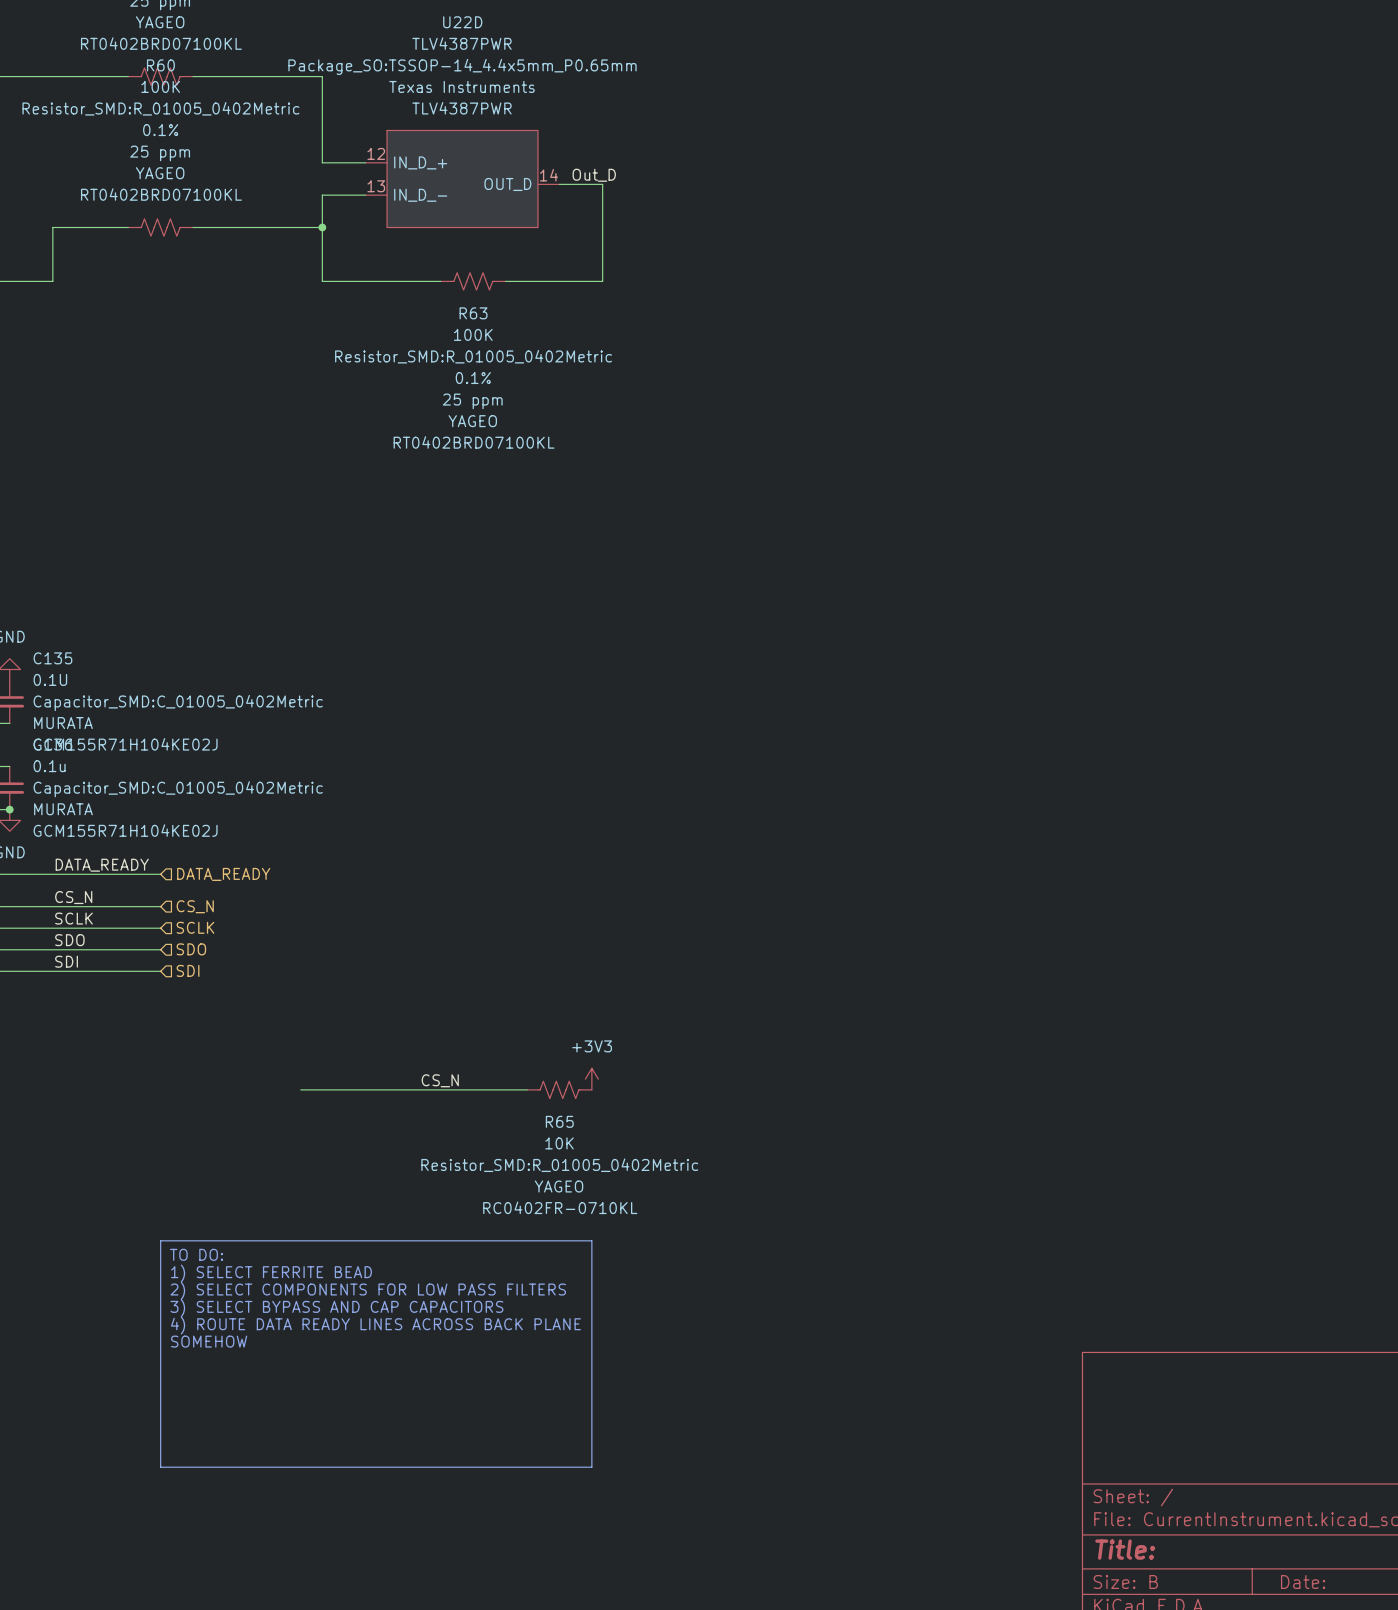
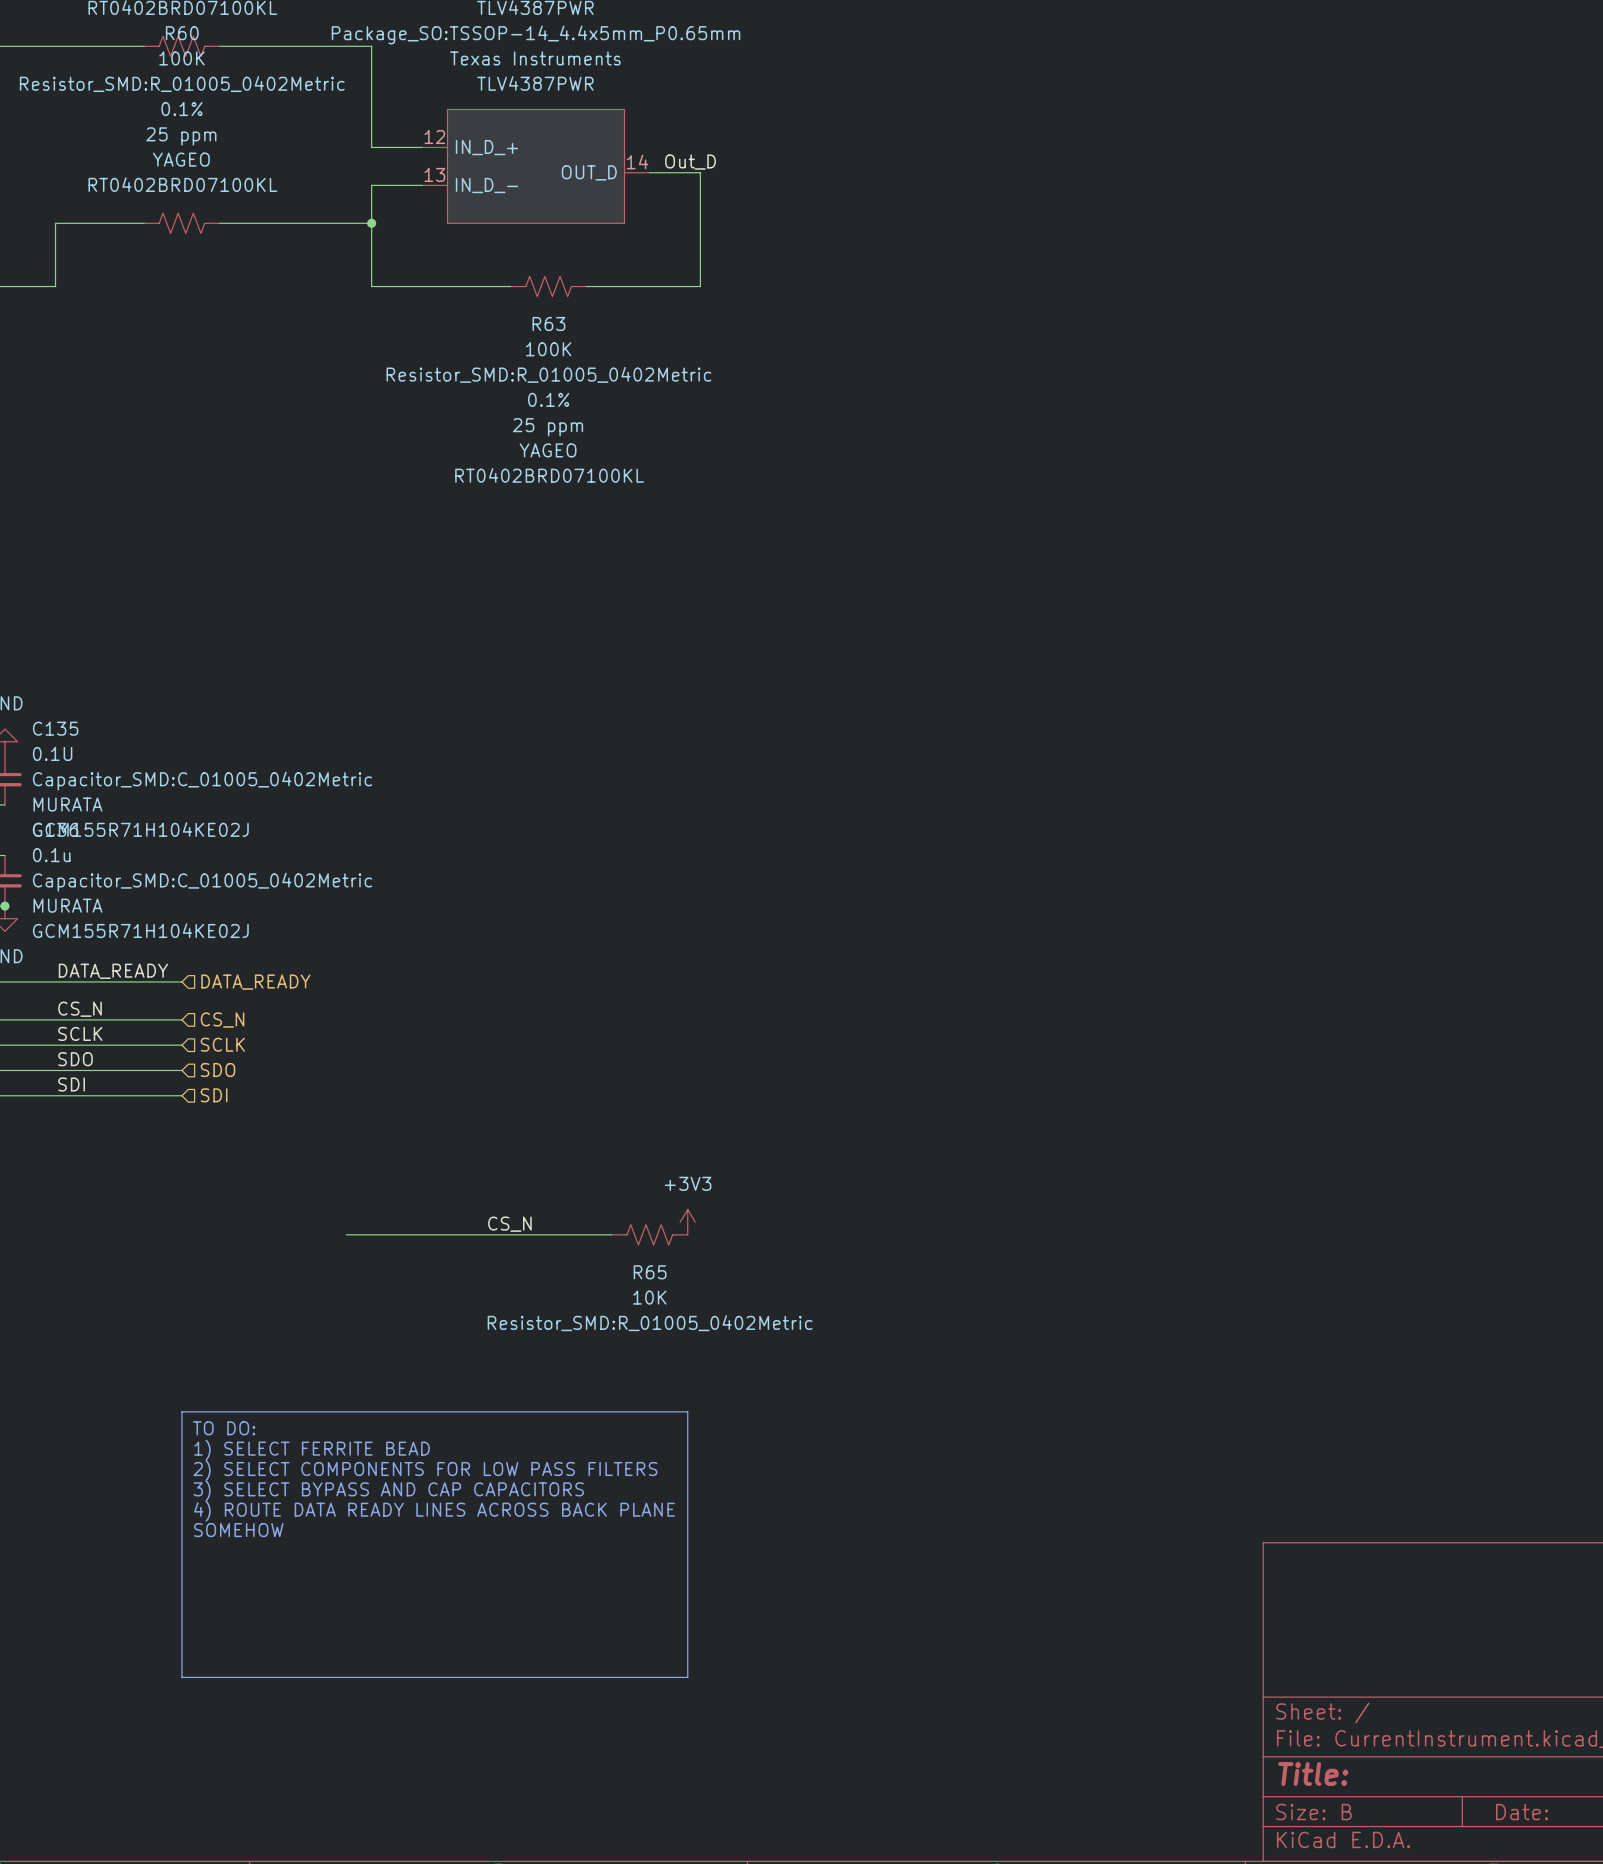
R65 text: YAGEO (559, 1186) -> none
R65 text: RC0402FR-0710KL (560, 1207) -> none

